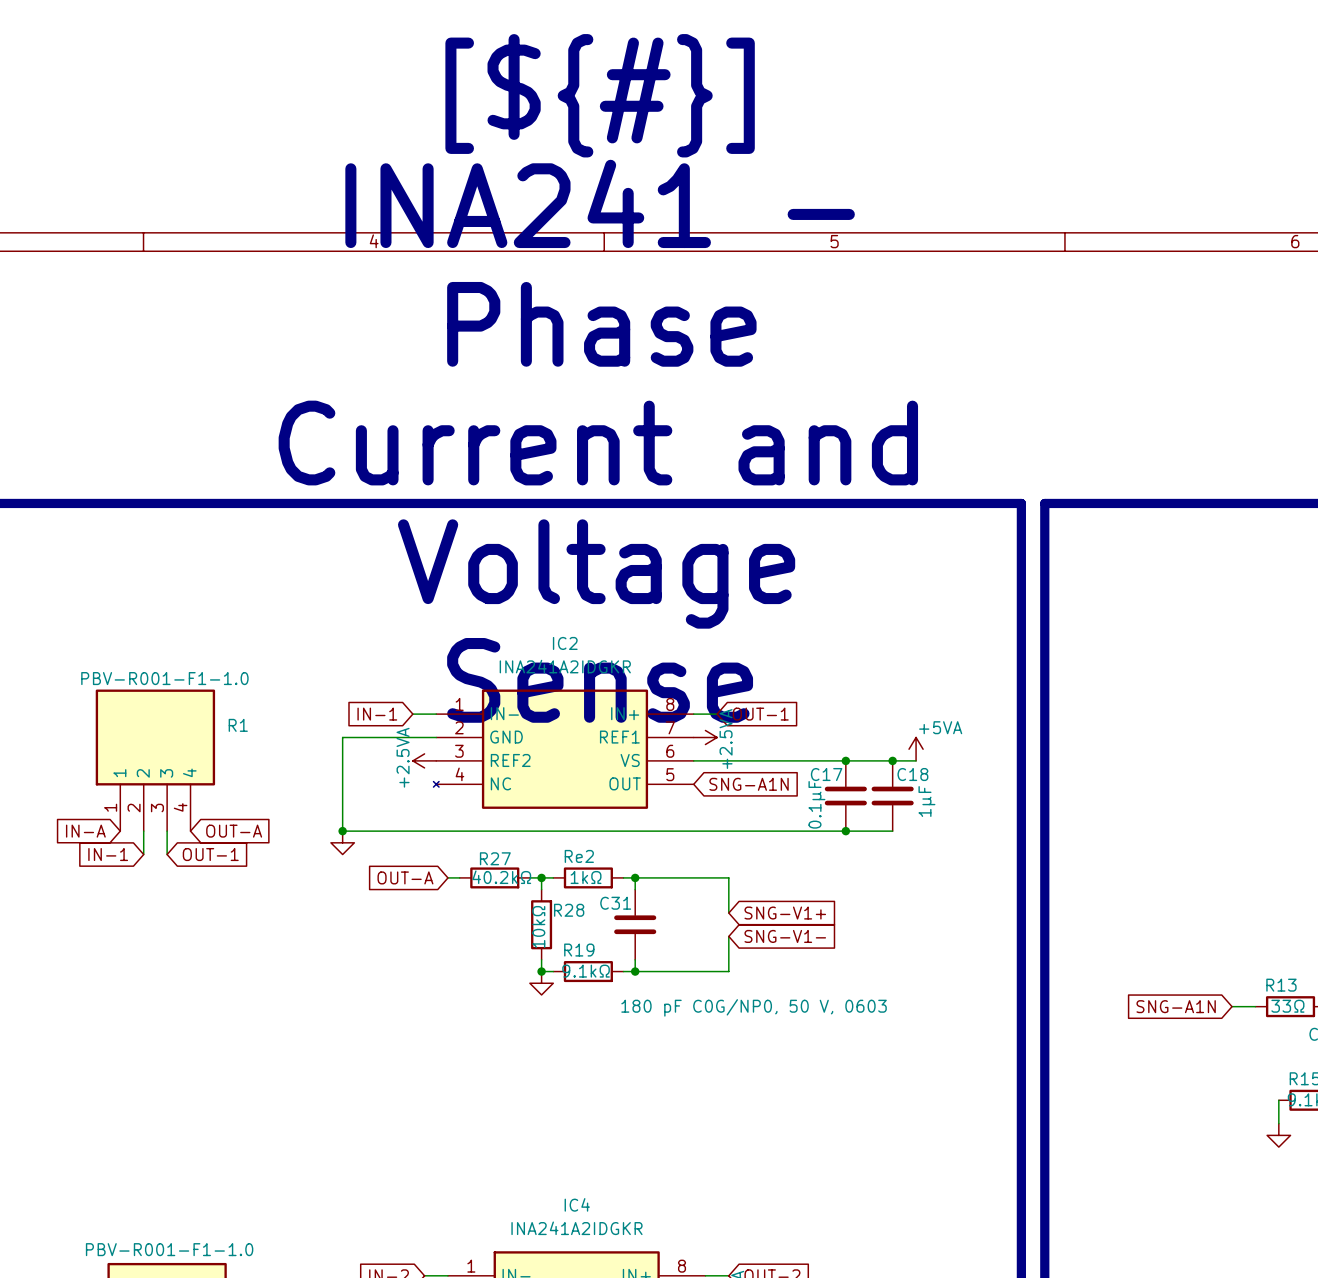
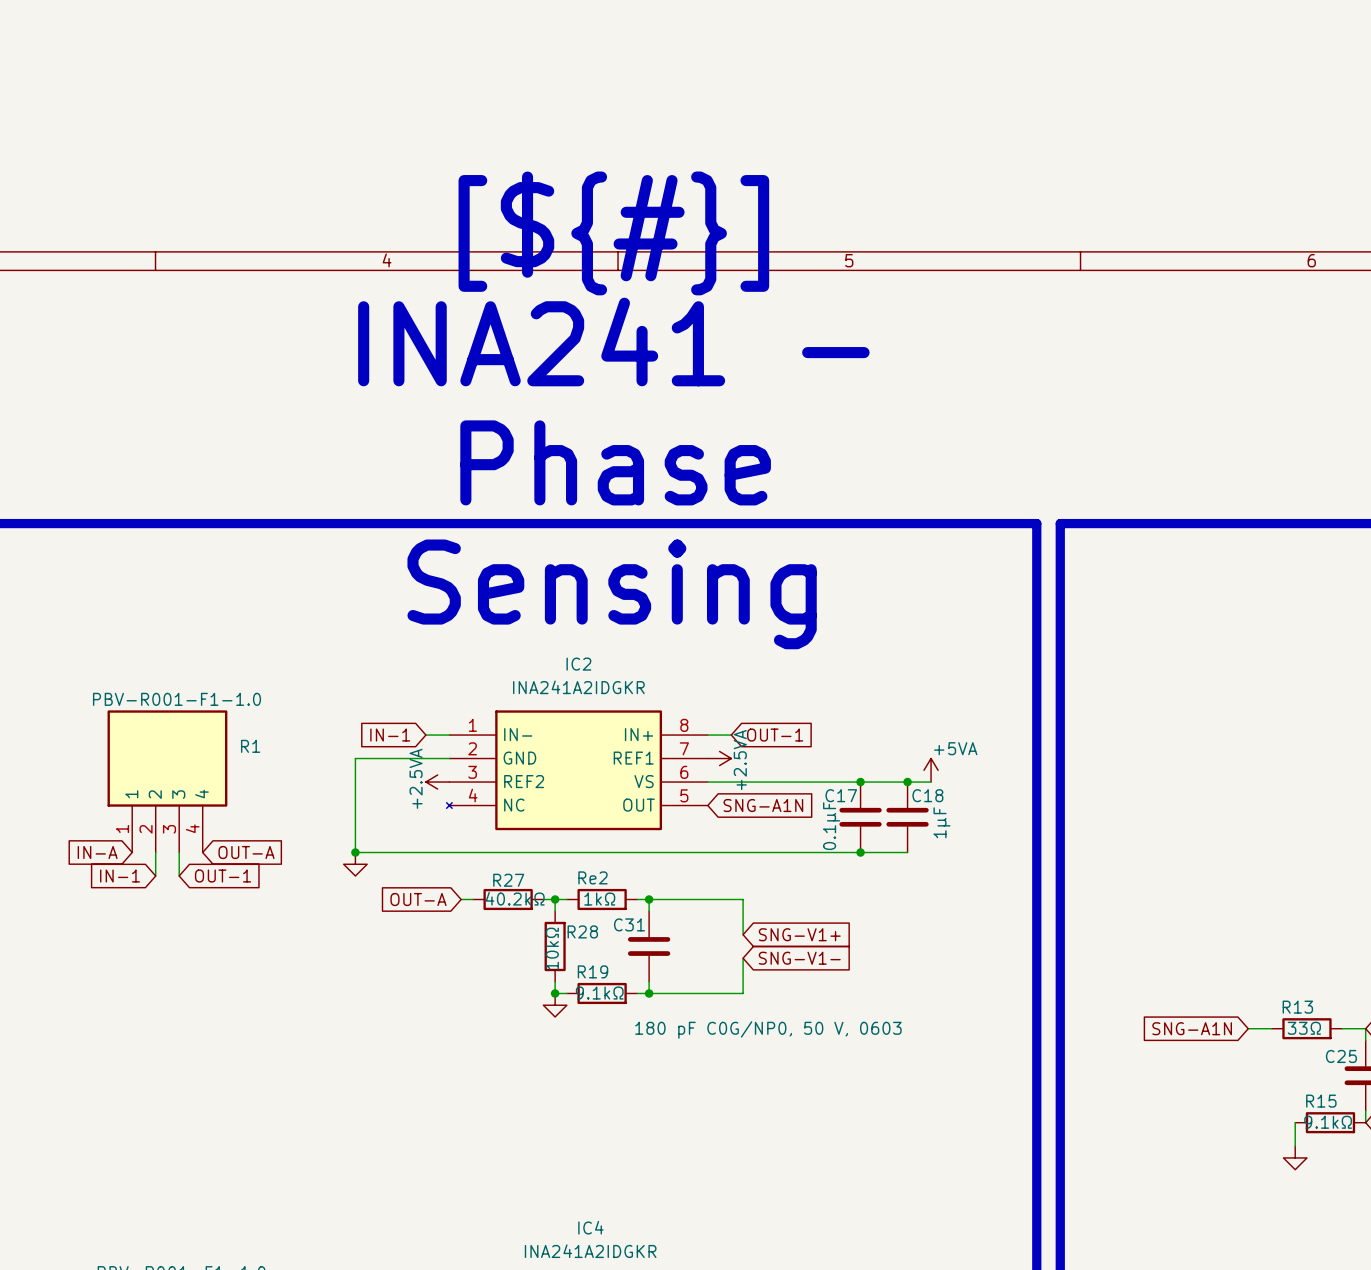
text: [${#}] (600, 95) -> none
text: INA241 - (600, 203) -> [${#}] (613, 233)
text: Phase (601, 324) -> INA241 - (613, 342)
text: Current and (598, 443) -> Phase (615, 462)
text: Voltage (596, 573) -> Sensing (612, 594)
text: Sense (600, 680) -> none

